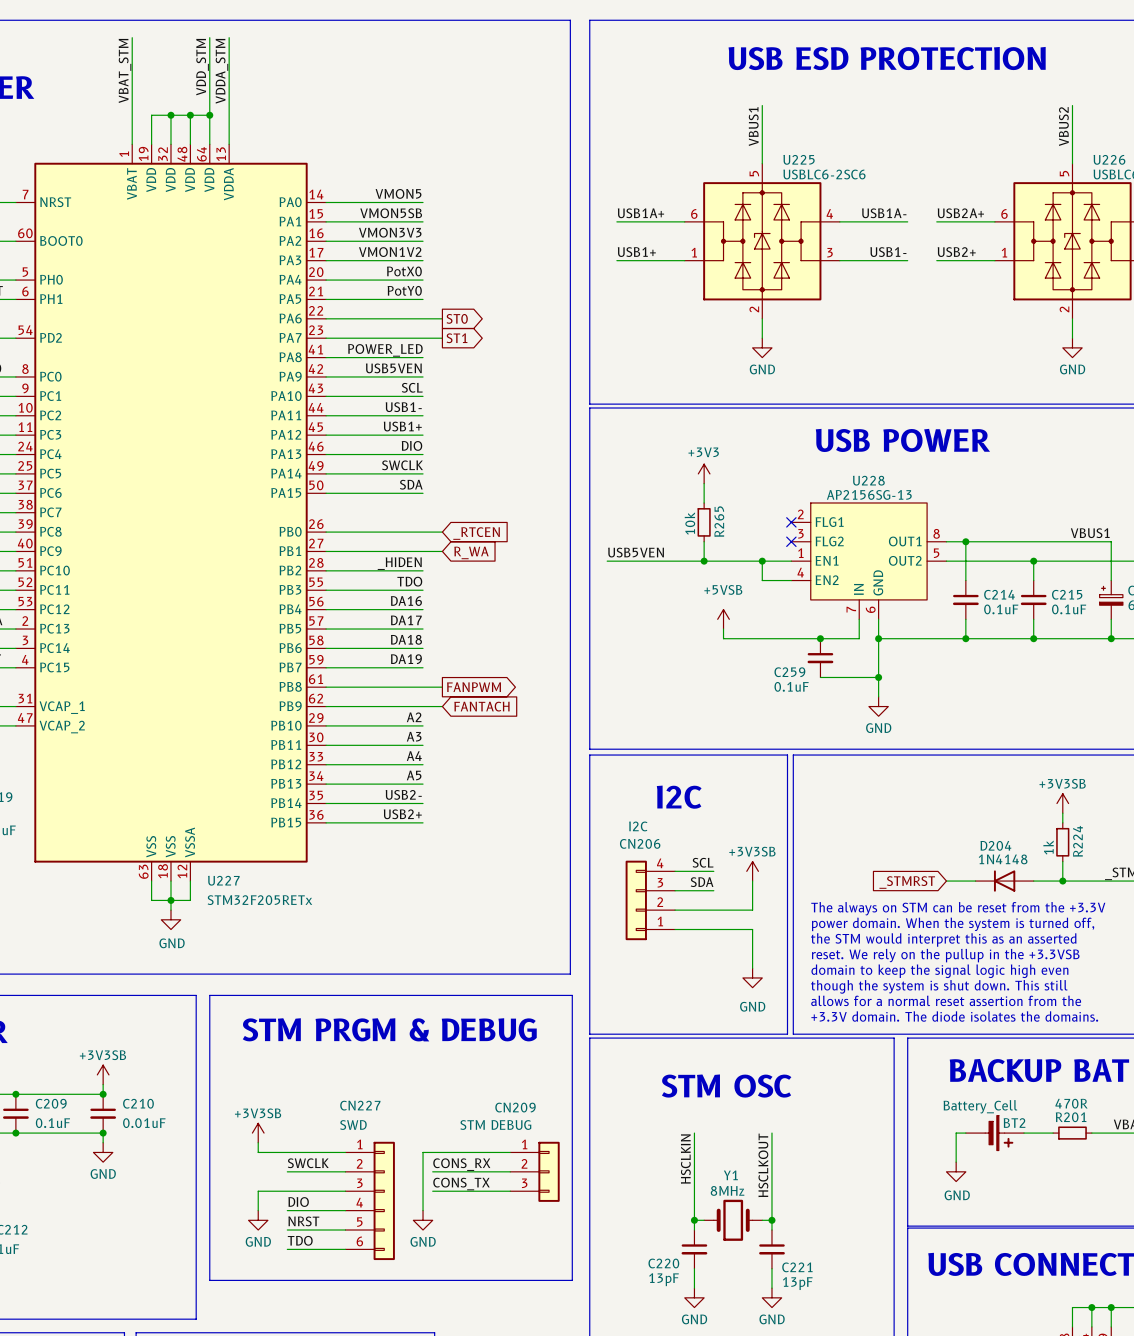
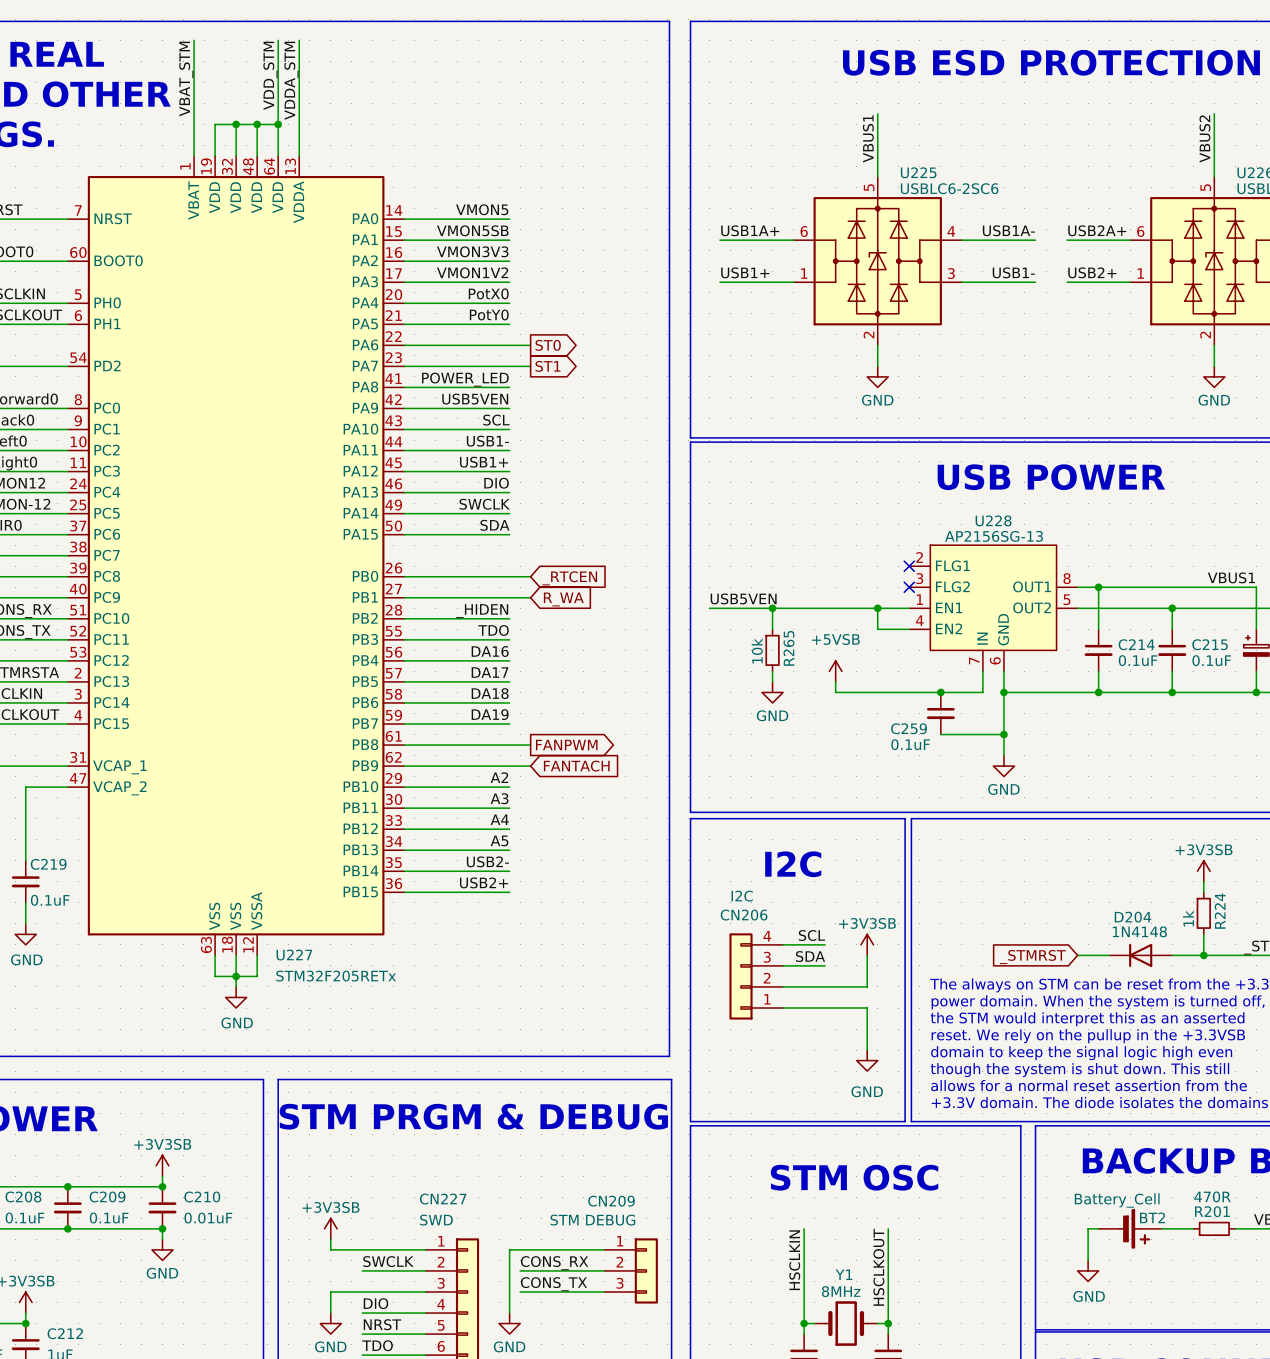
power symbol: +3V3 (704, 473) -> none
wire: (704, 483) (704, 502) -> none
R265 position: (704, 522) -> (772, 650)
wire: (704, 541) (704, 561) -> (772, 608) (772, 629)
junction position: (704, 561) -> (772, 608)
wire: none -> (772, 671) (772, 681)
power symbol: none -> GND (772, 692)

